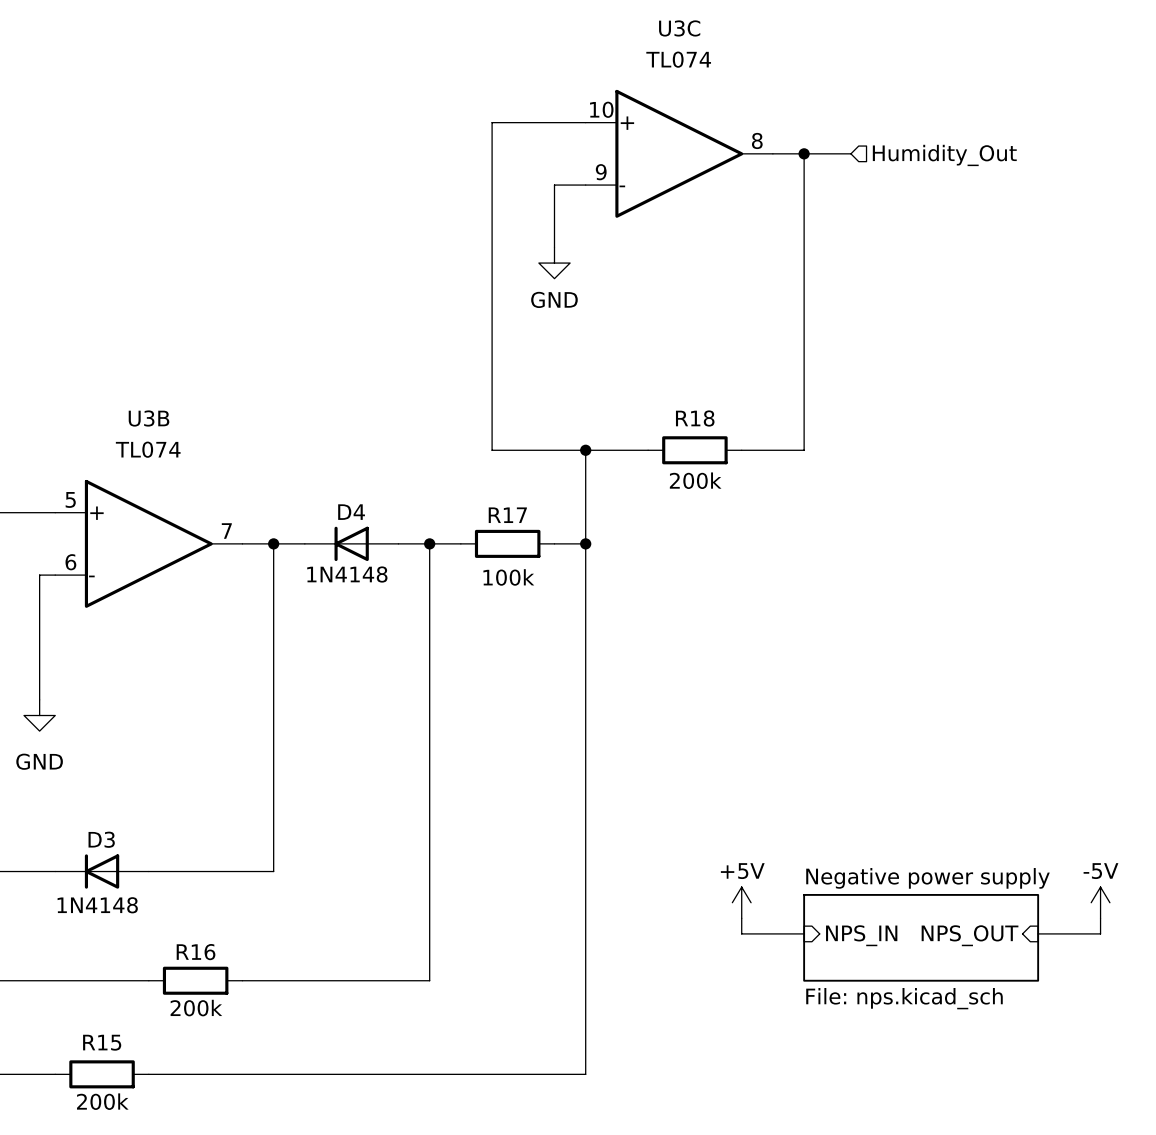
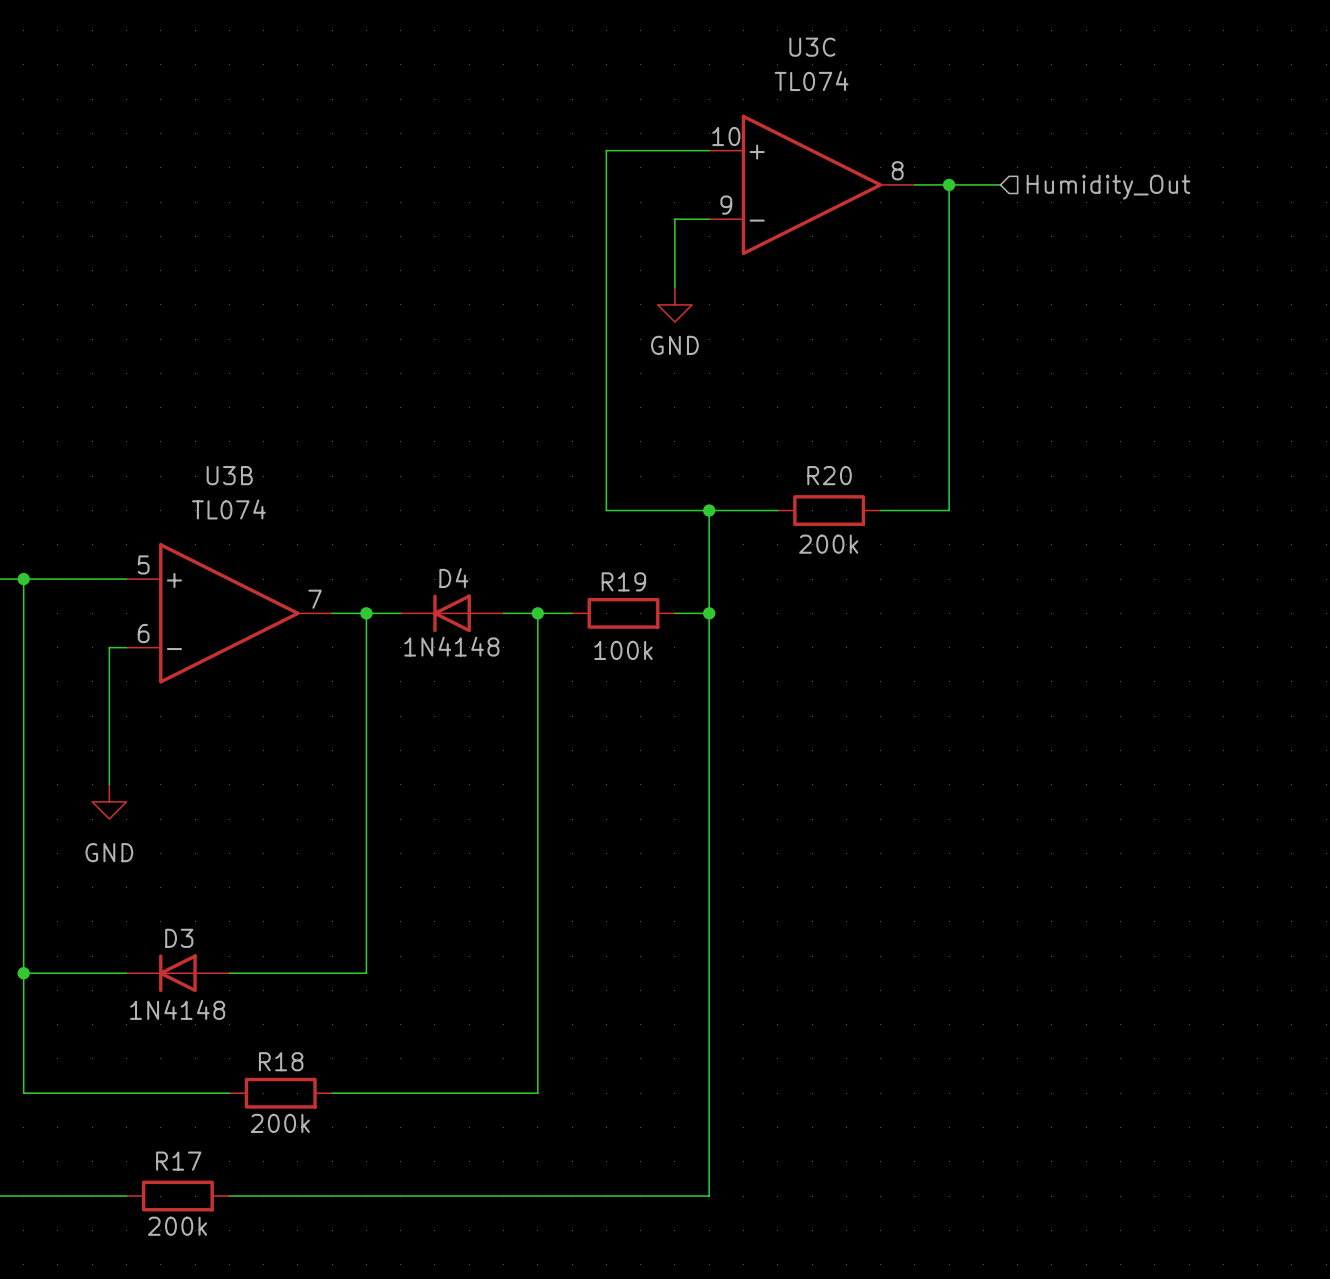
R18 name: R18 (695, 418) -> R20 (829, 475)
R17 name: R17 (507, 515) -> R19 (623, 581)
power symbol: +5V (741, 902) -> none
power symbol: -5V (1100, 902) -> none
wire: (741, 918) (741, 933) (804, 933) -> none
wire: (1100, 918) (1100, 933) (1038, 933) -> none
hierarchical label: NPS_IN (861, 935) -> none
hierarchical label: NPS_OUT (970, 935) -> none
sheet Negative power supply: File: nps.kicad_sch (921, 937) -> none
R16 name: R16 (196, 952) -> R18 (281, 1061)
R15 name: R15 (102, 1042) -> R17 (178, 1161)

